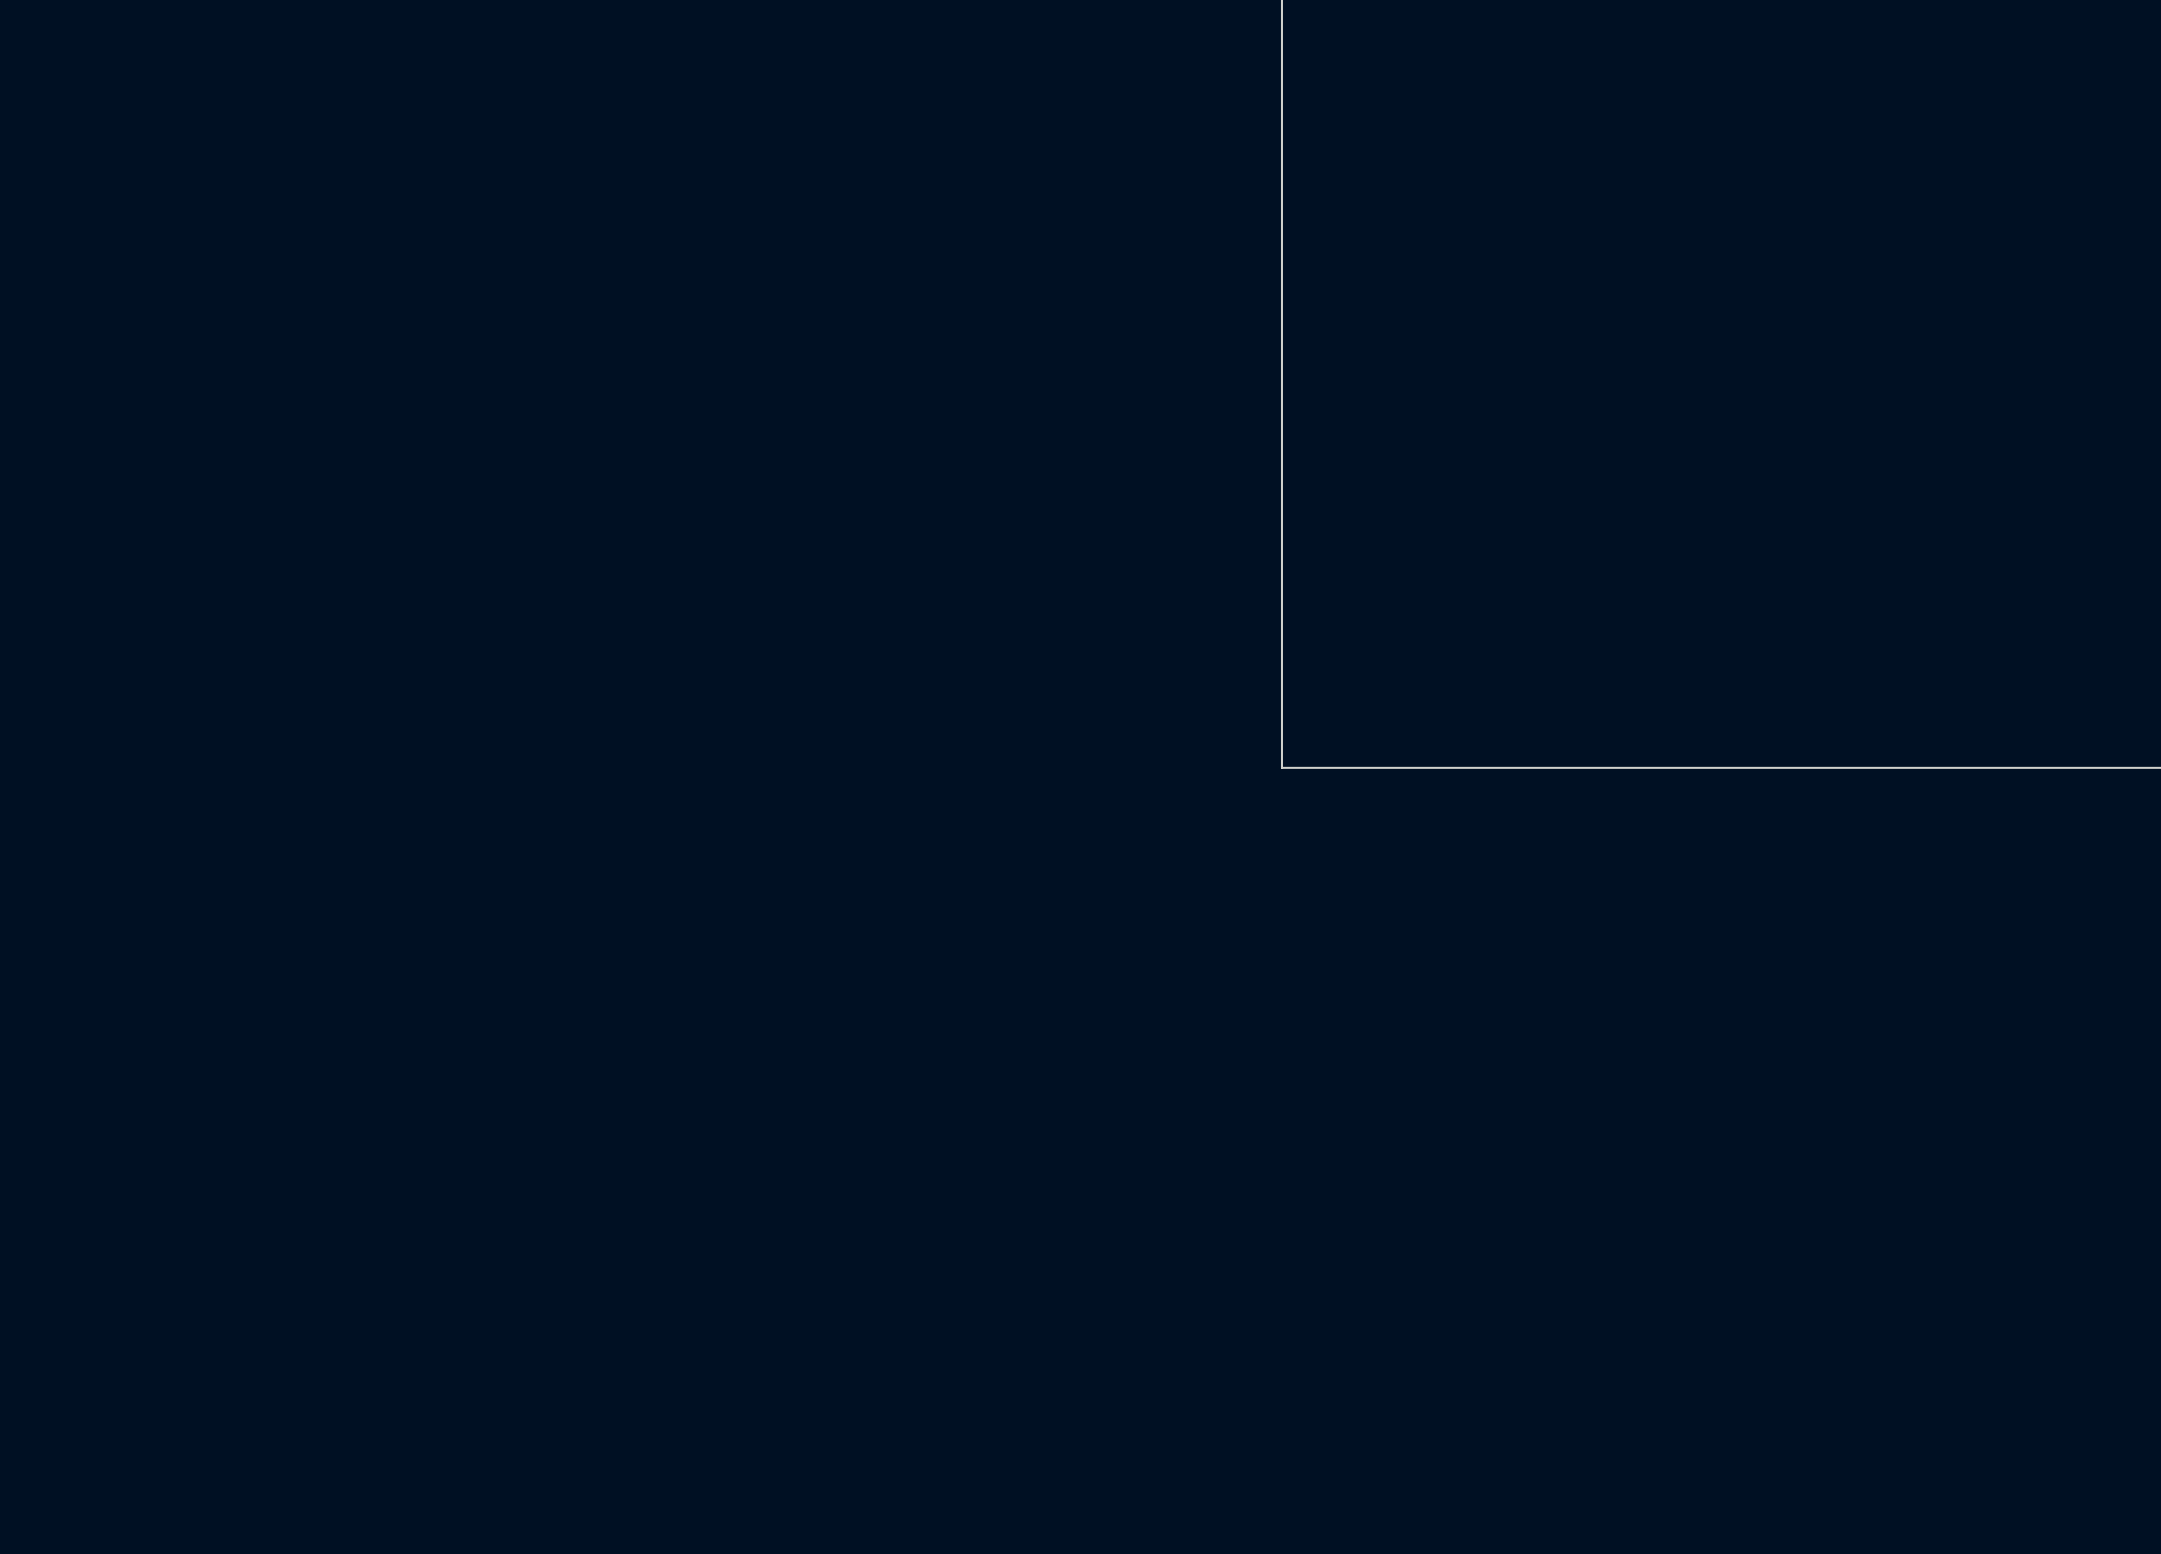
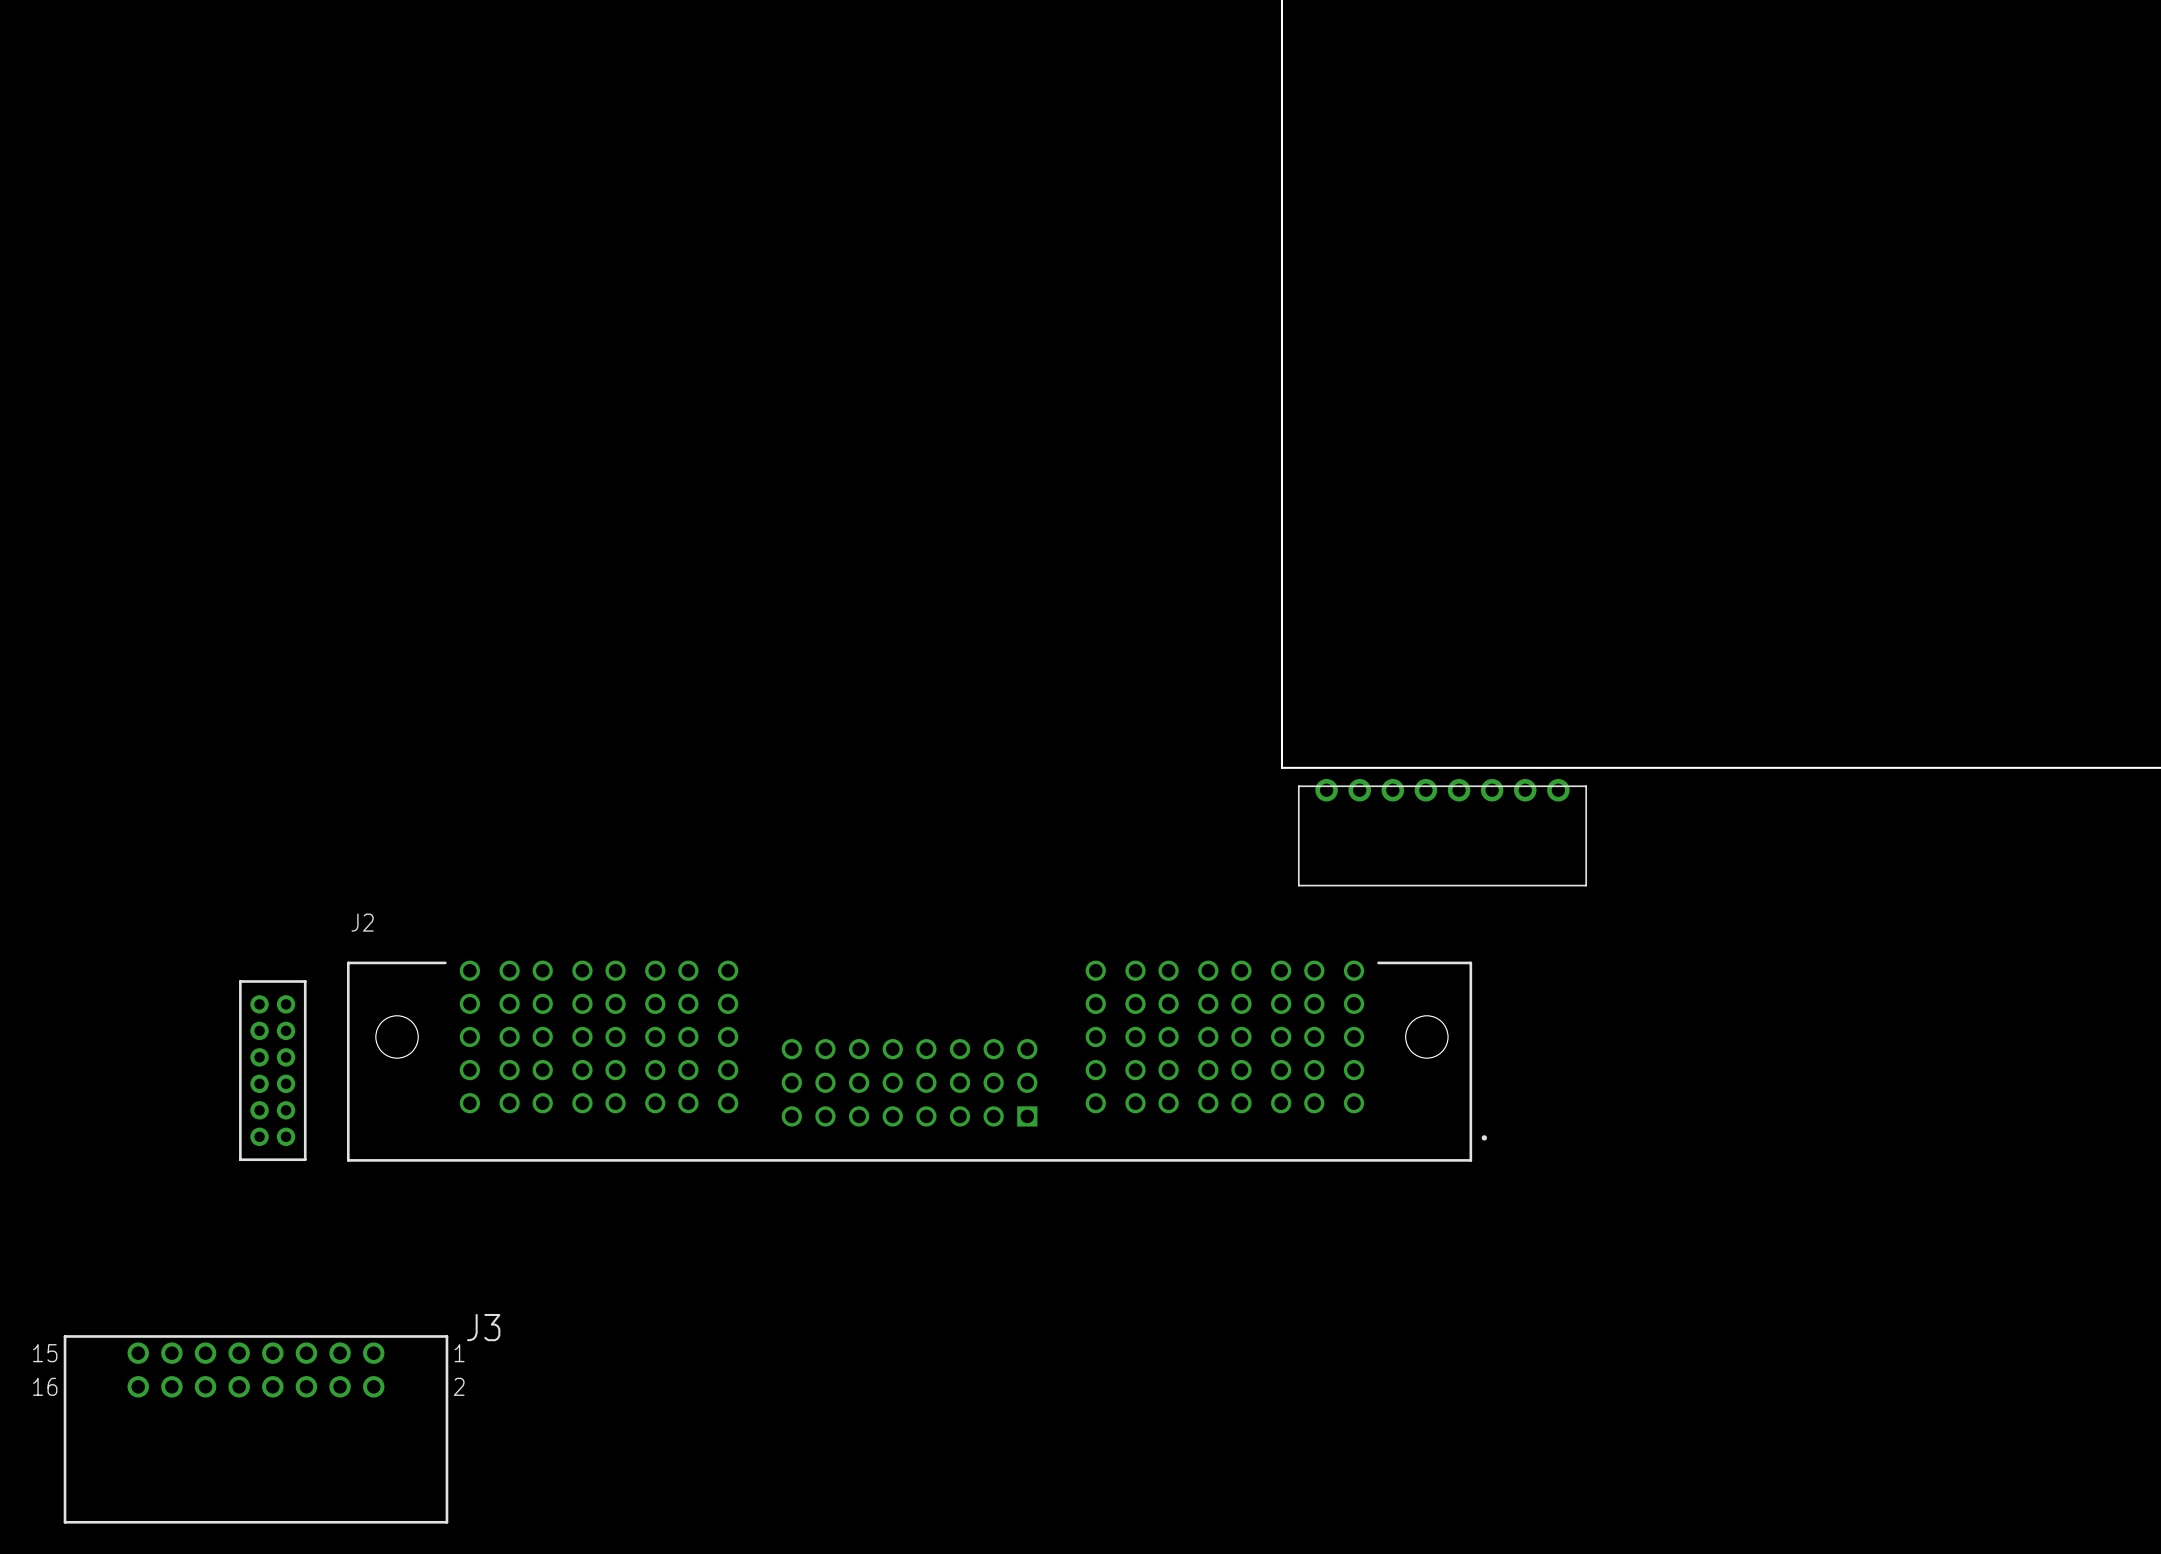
part: none -> (1442, 832)
J2: none -> (916, 1061)
part: none -> (272, 1070)
J3: none -> (255, 1429)

